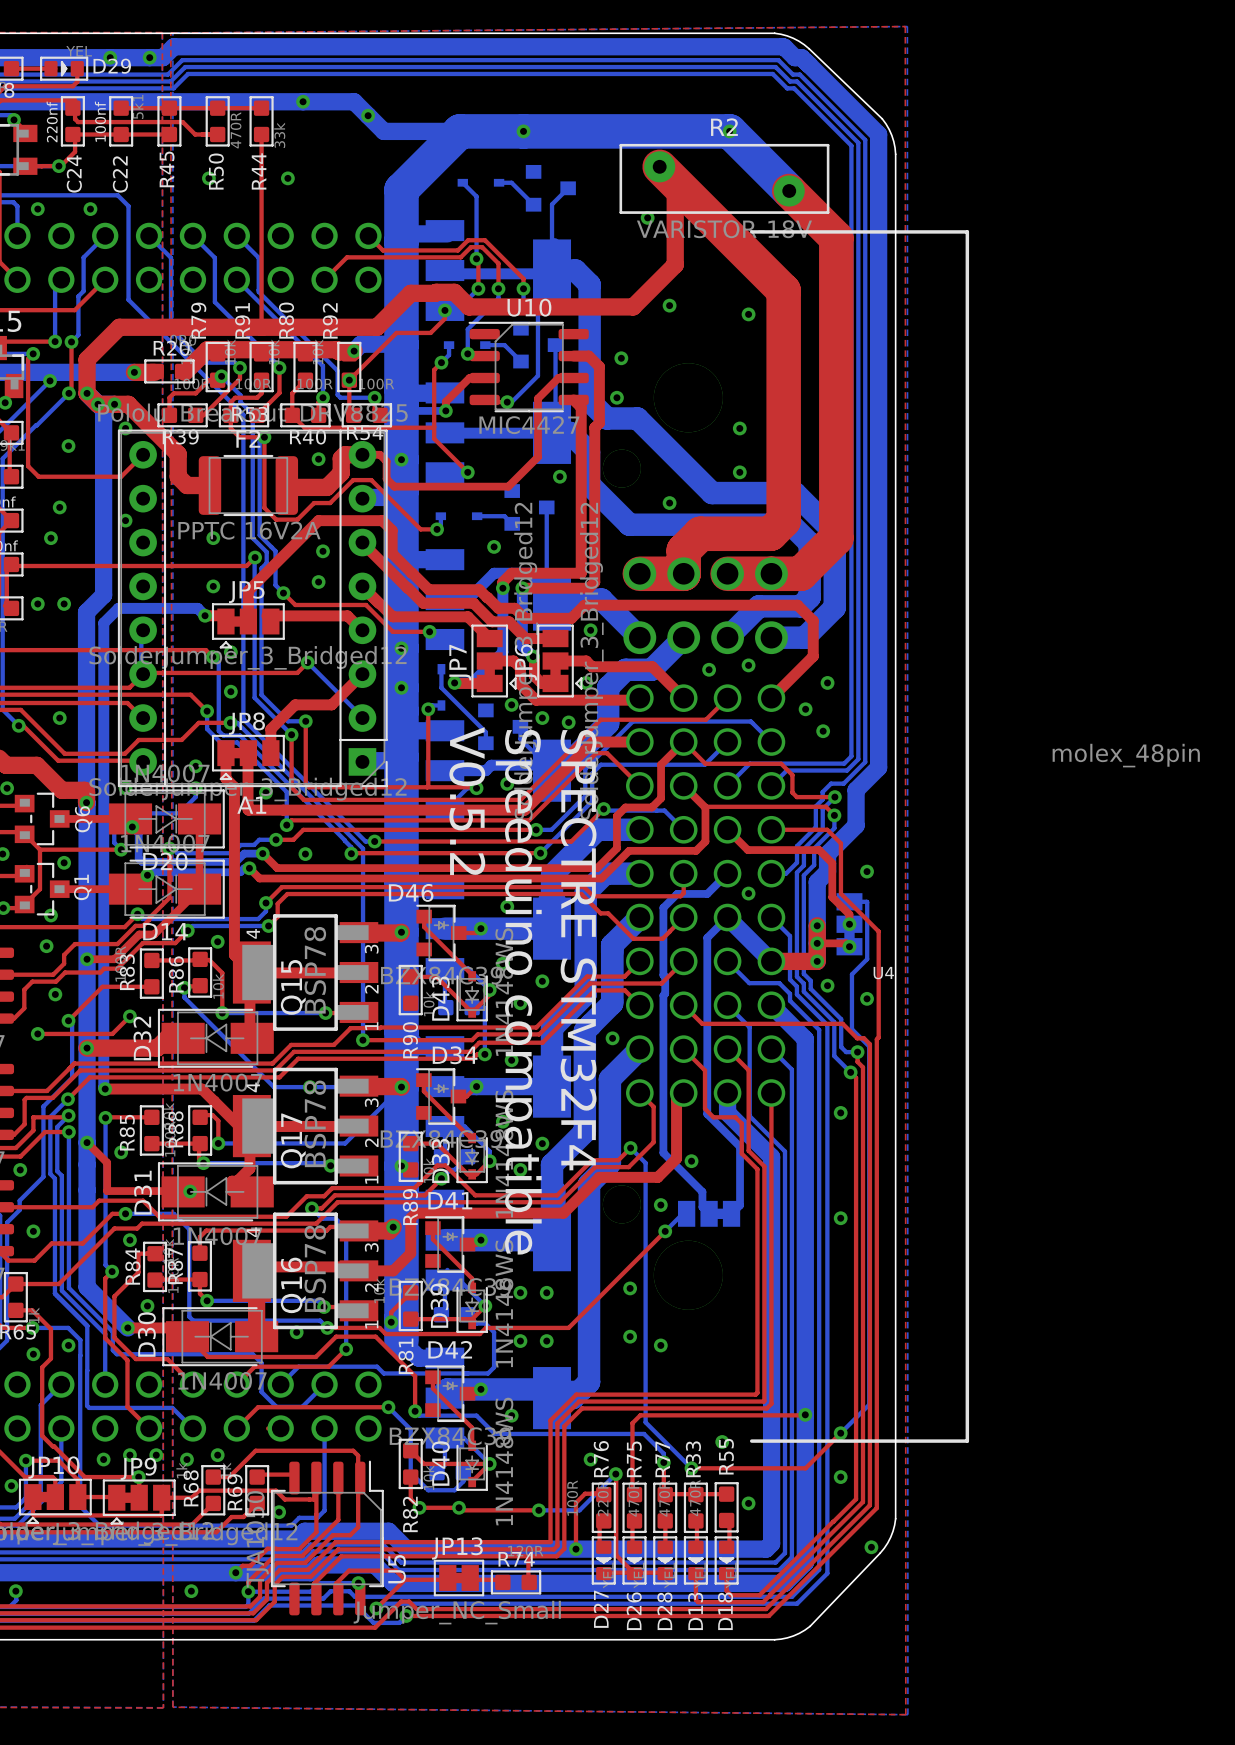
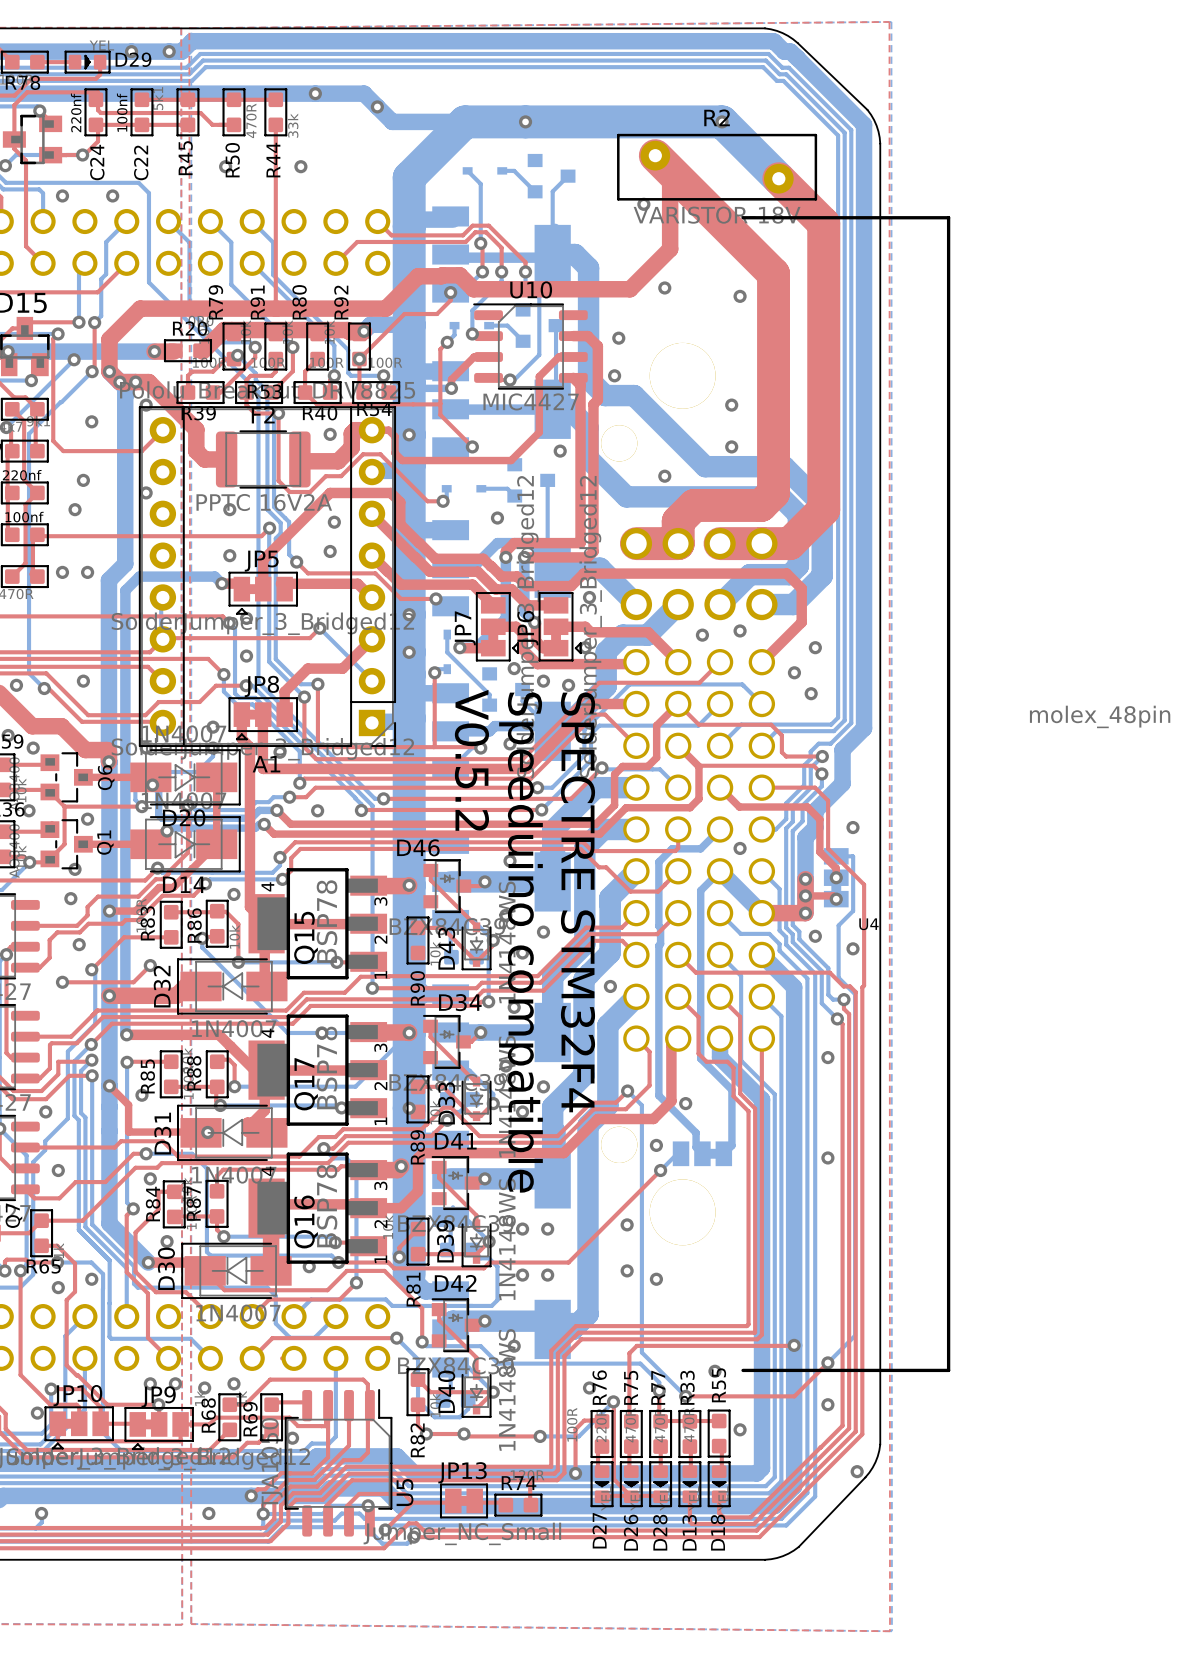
via: (103, 1459) -> none

